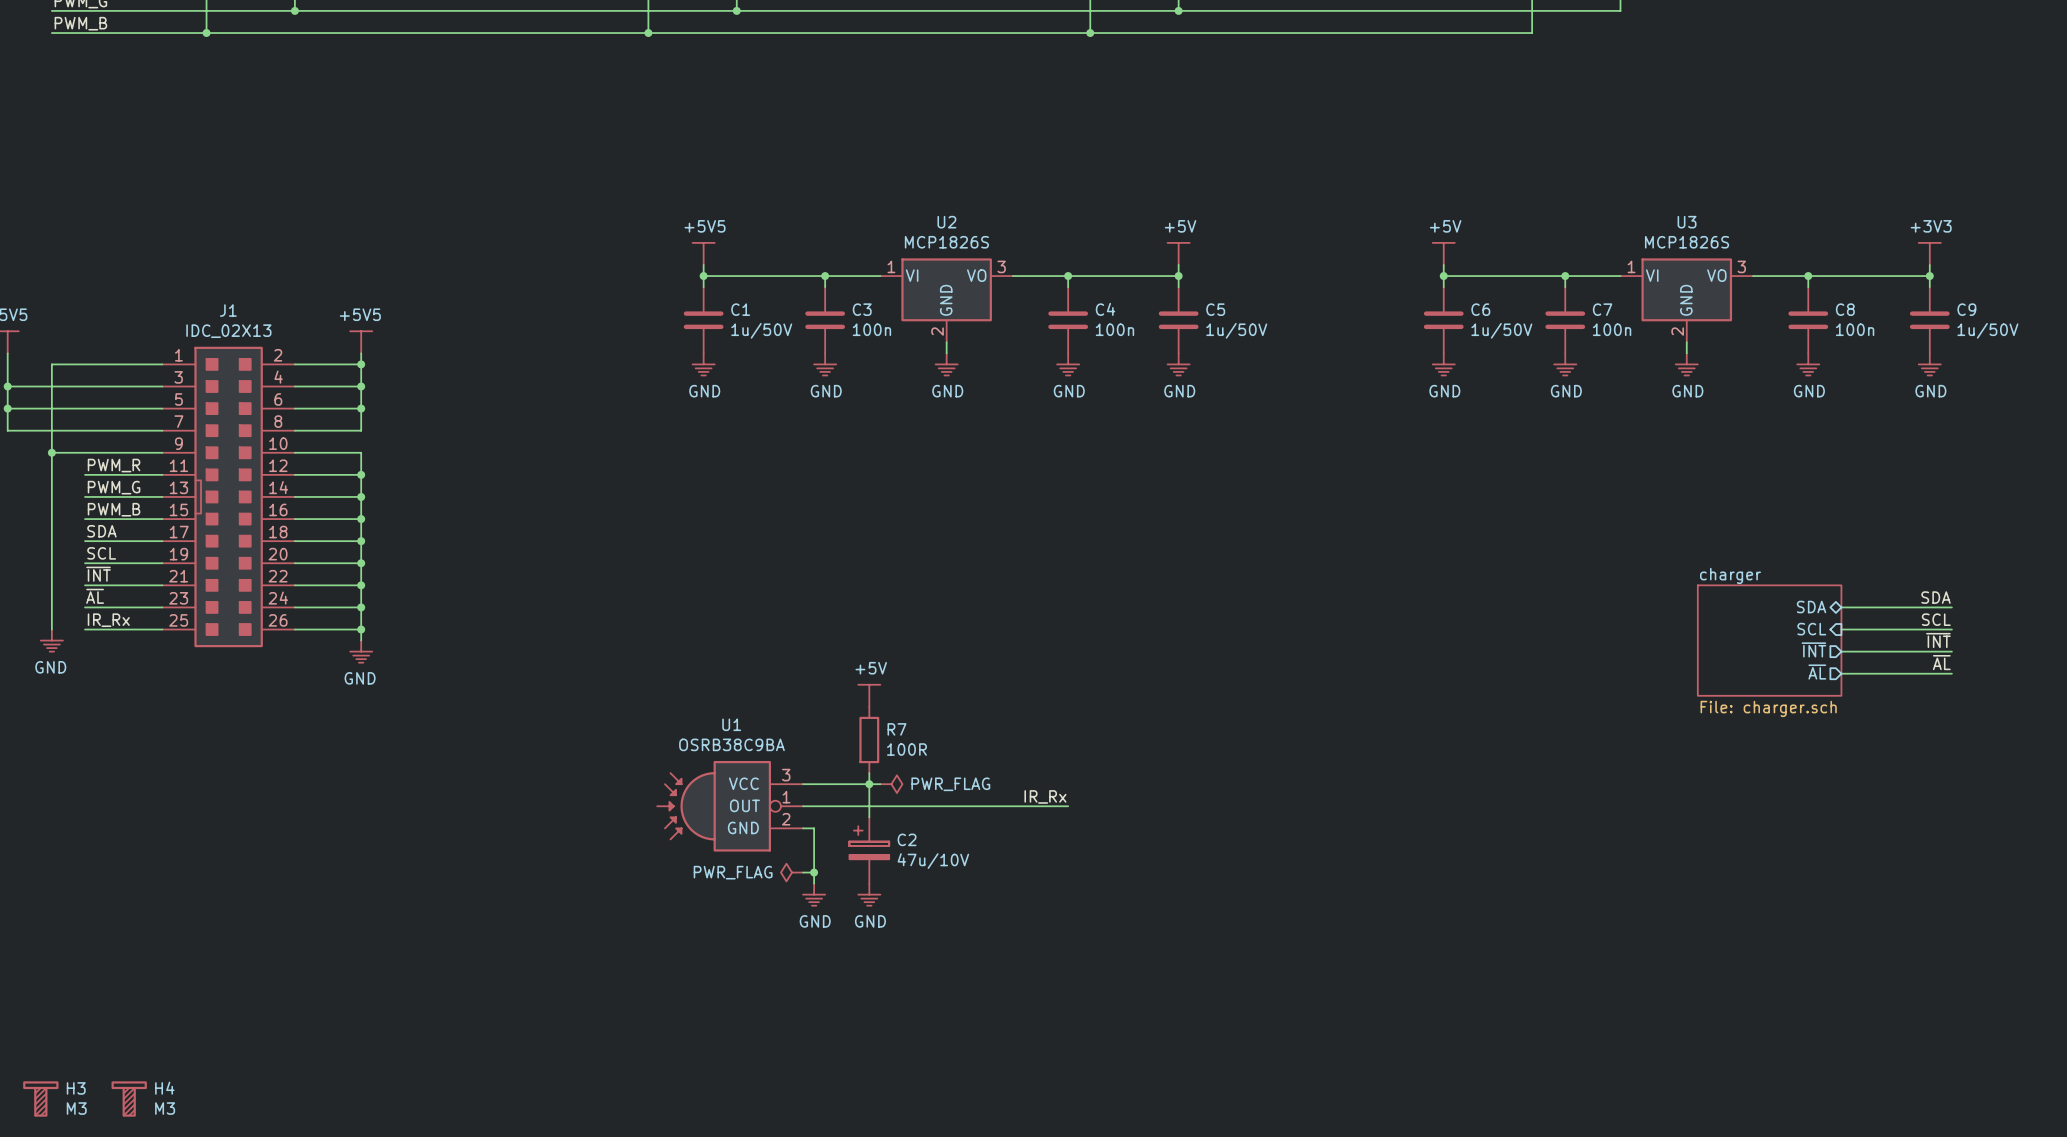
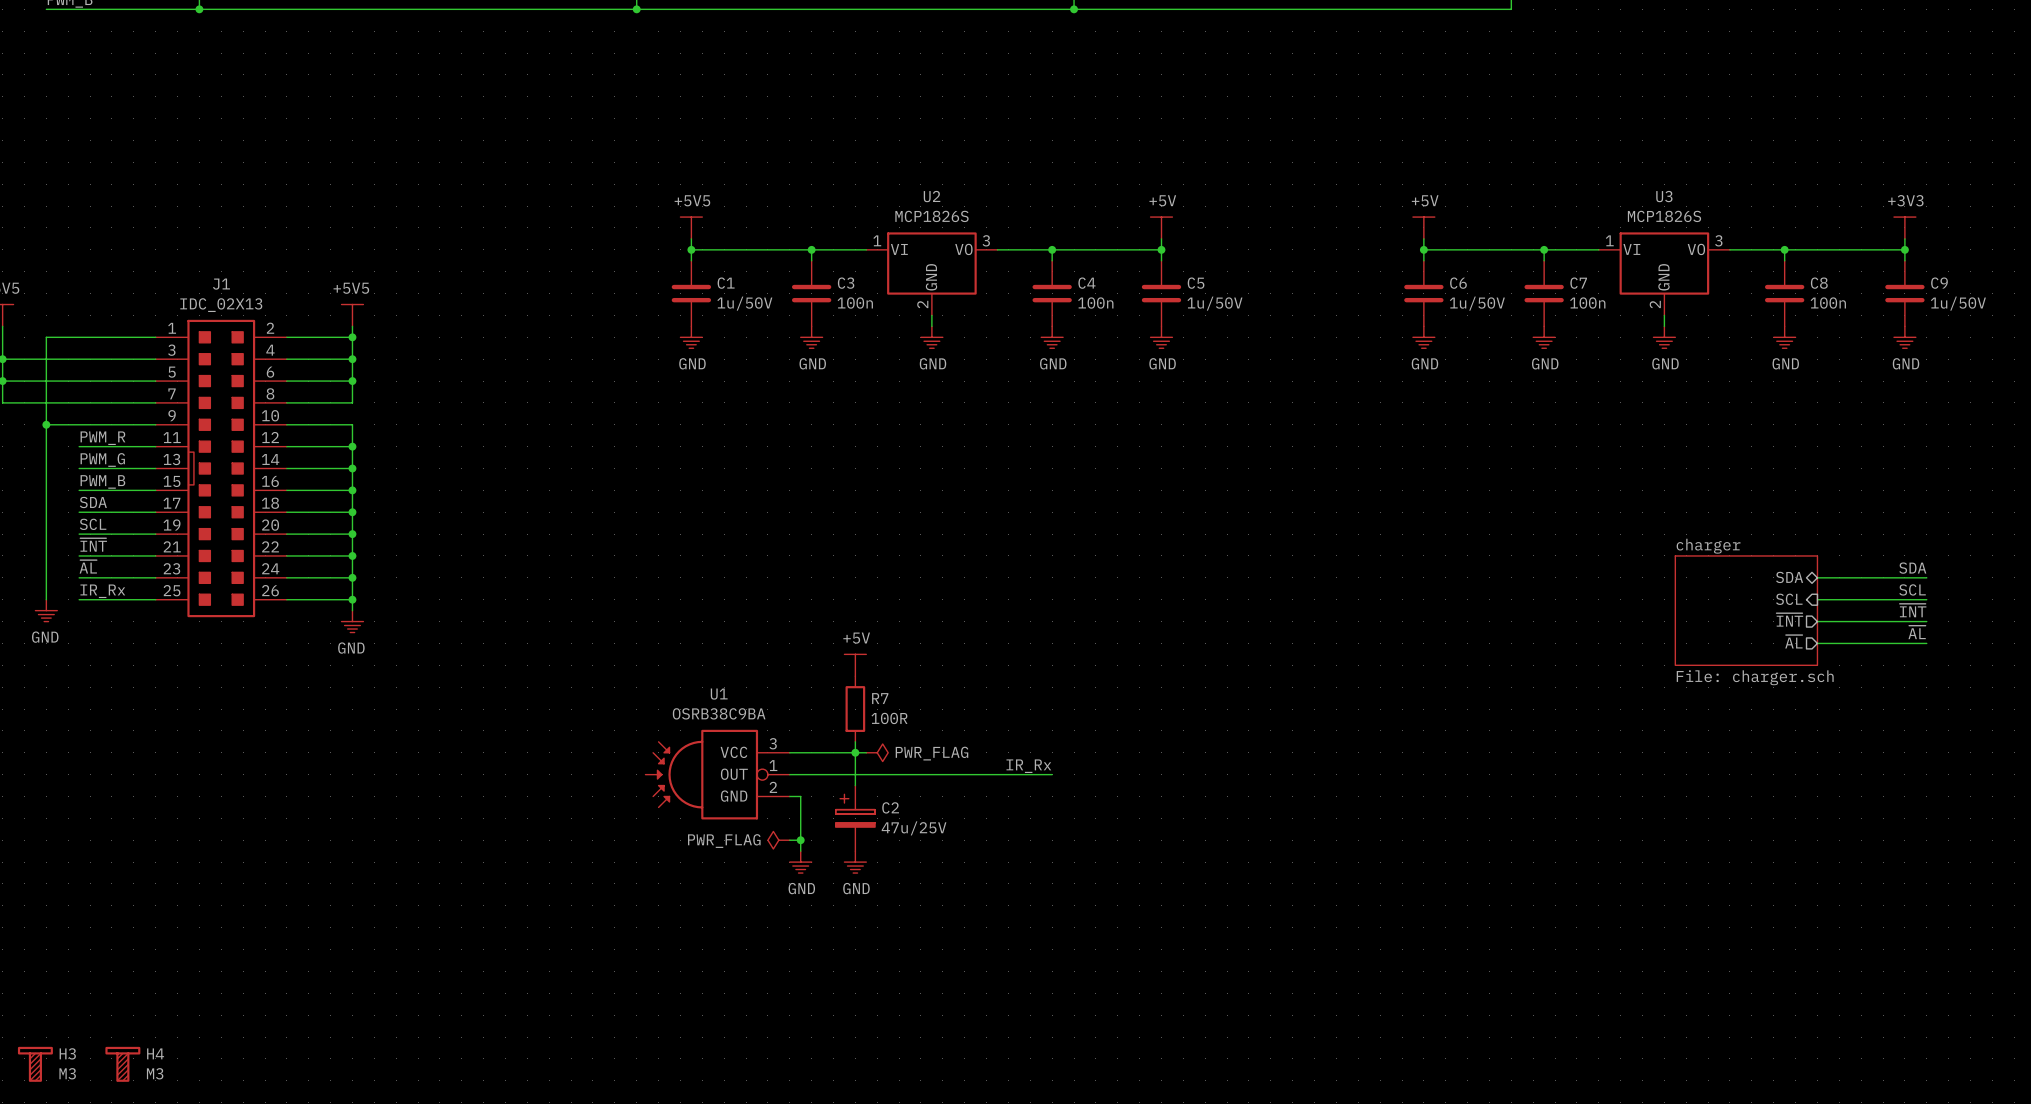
C2 value: 47u/10V (933, 861) -> 47u/25V (914, 828)

